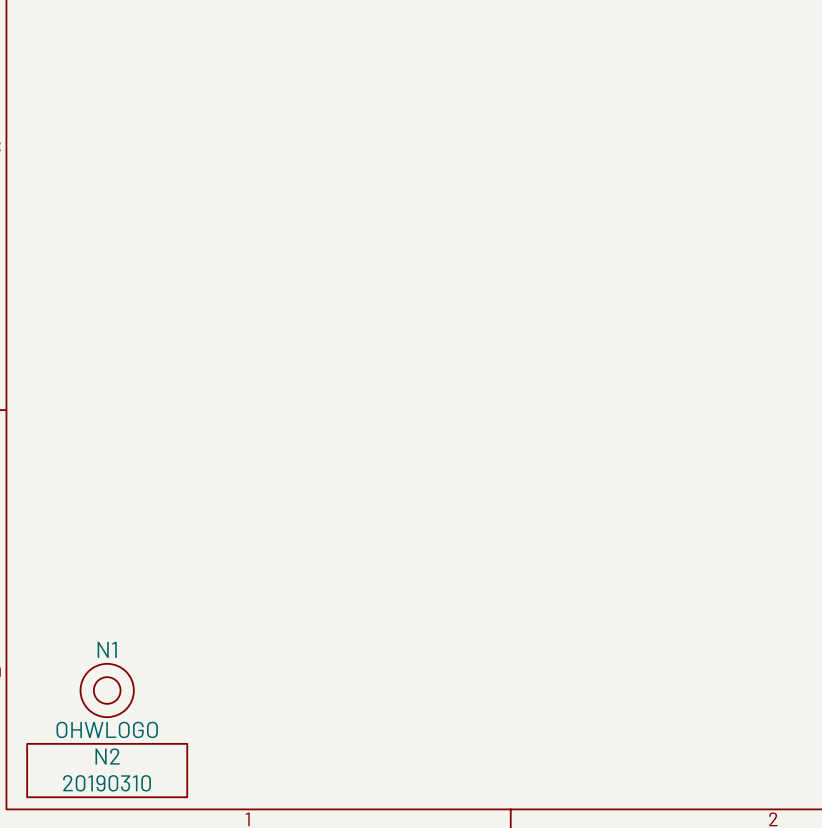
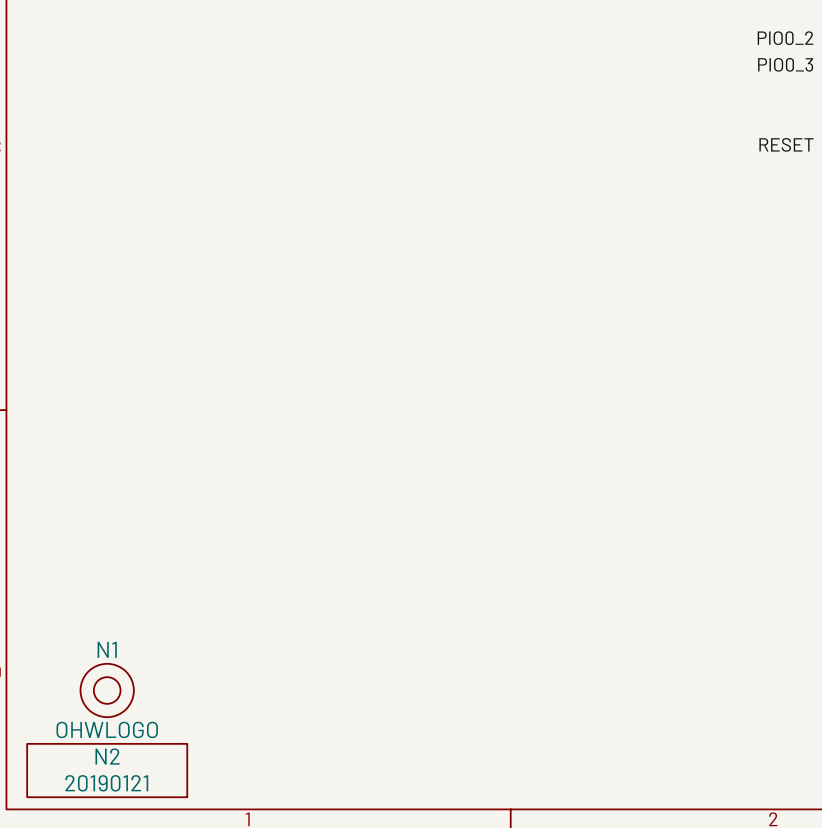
label: none -> PIO0_2 (785, 38)
label: none -> PIO0_3 (785, 64)
label: none -> RESET (786, 144)
N2 value: 20190310 (107, 783) -> 20190121 (106, 783)

